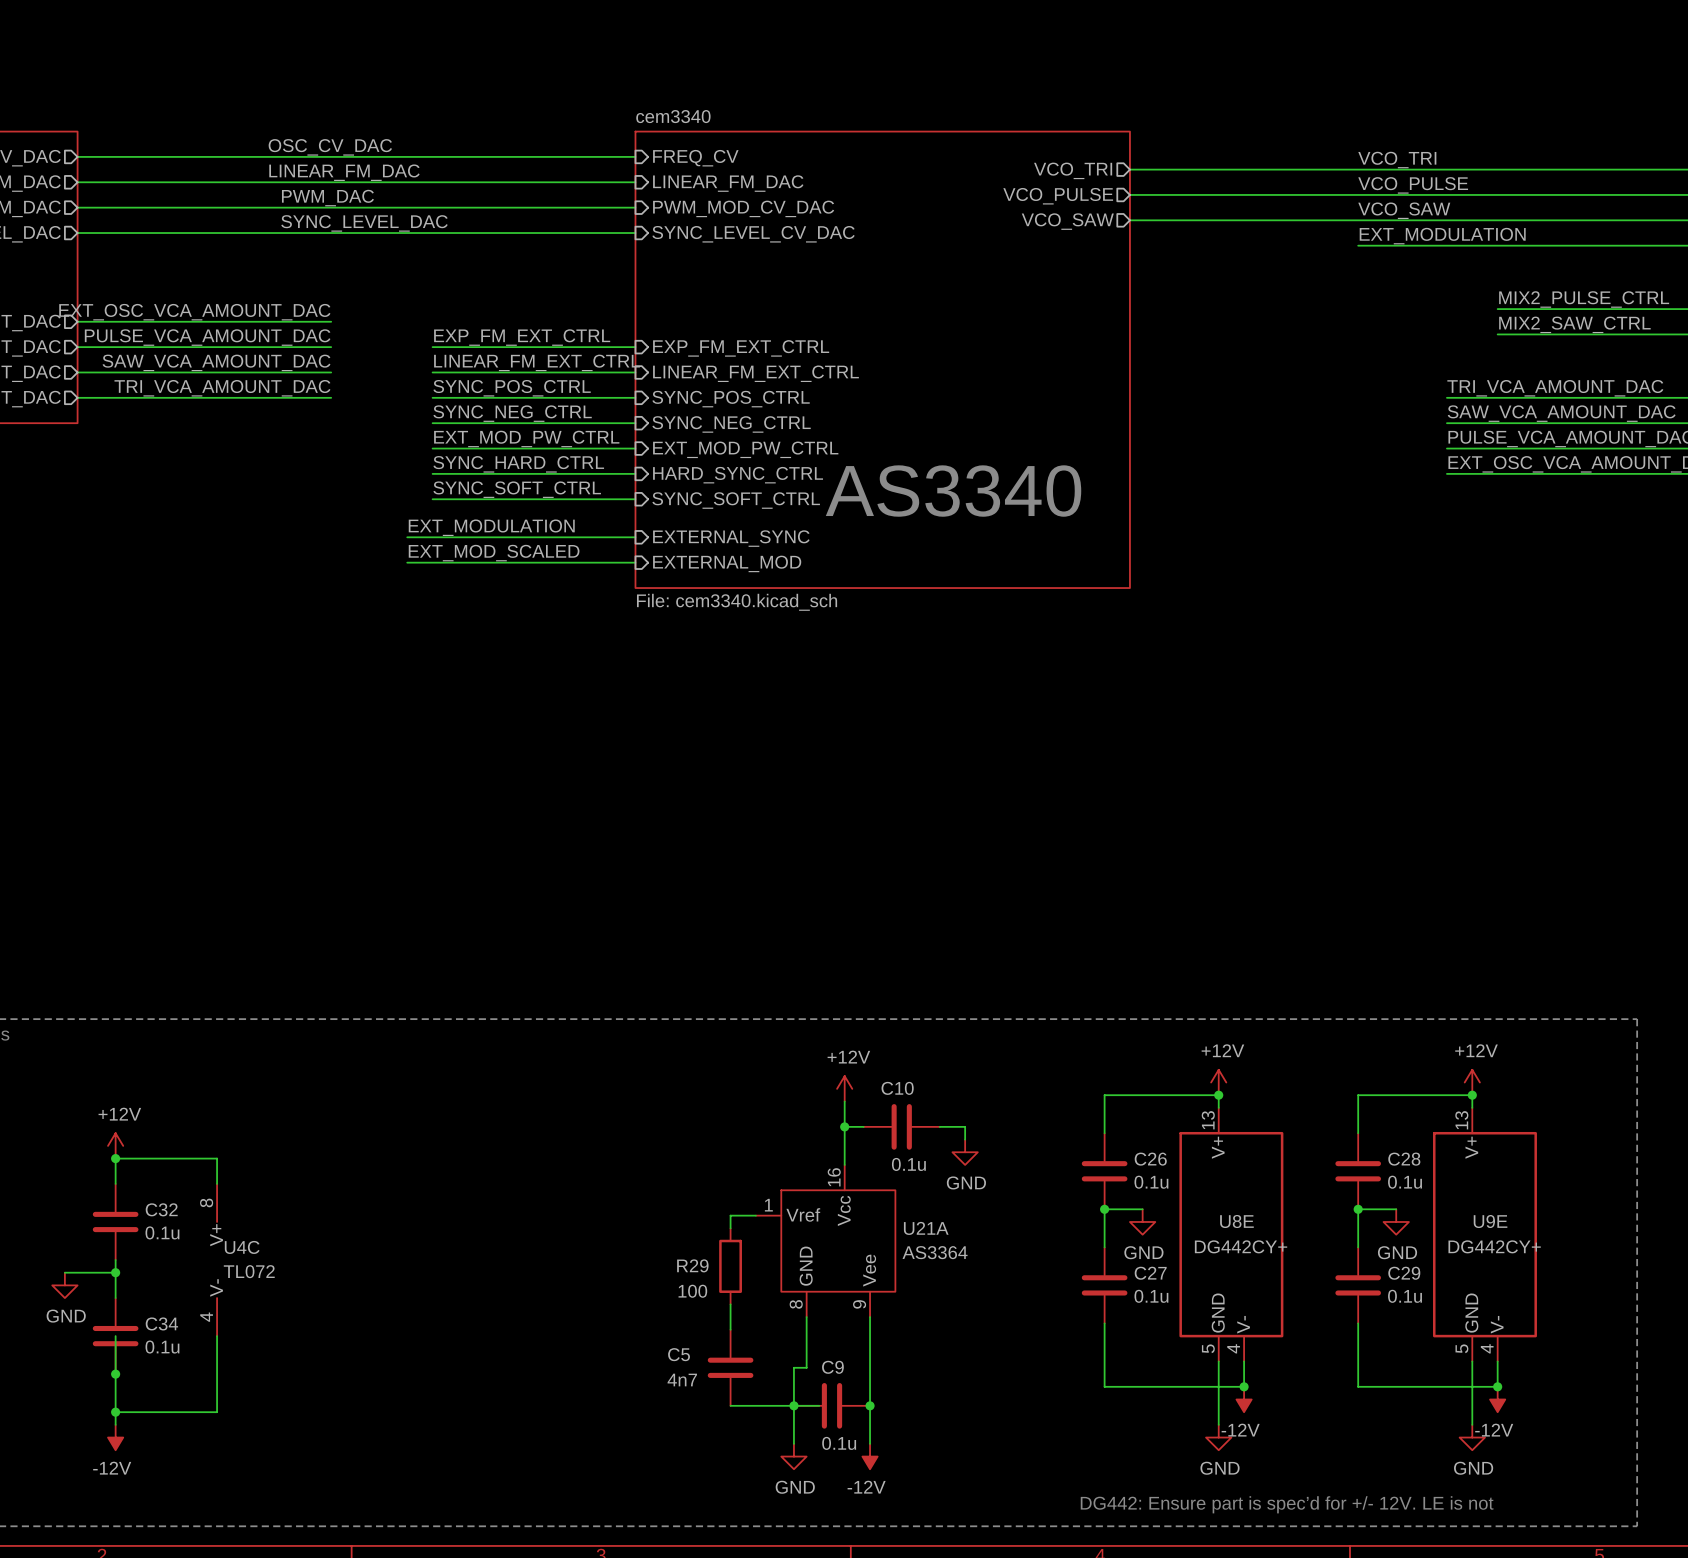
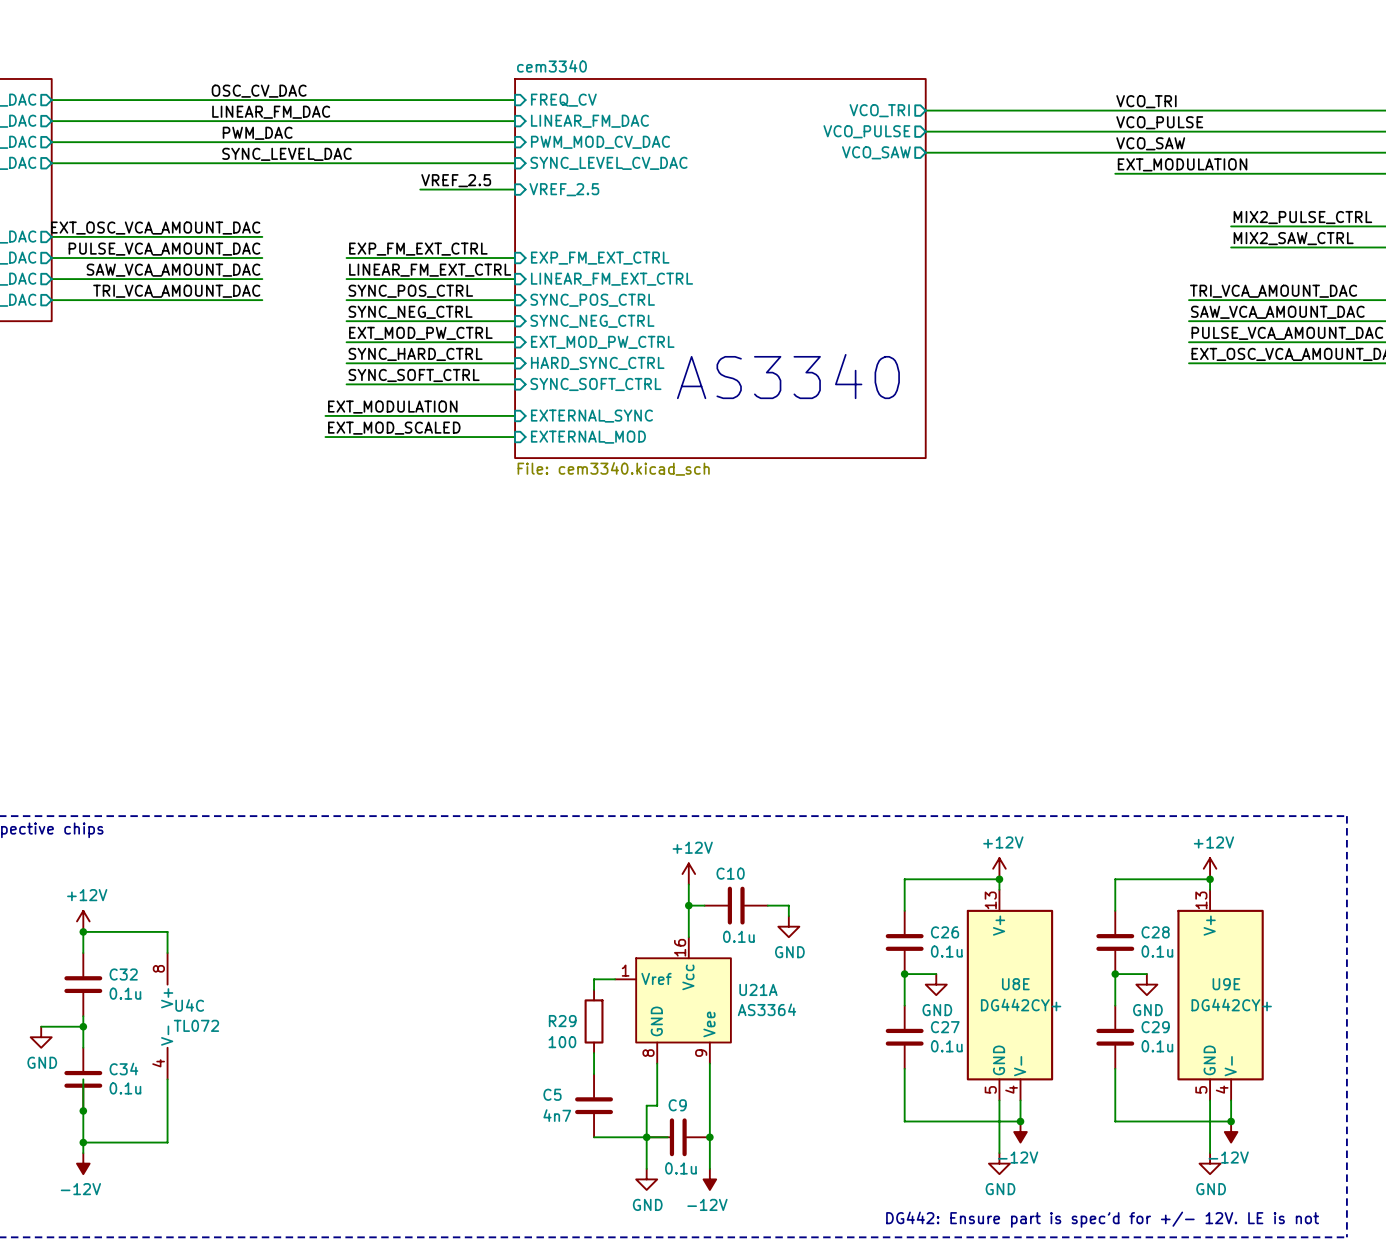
label: none -> VREF_2.5 (456, 180)
wire: none -> (420, 189) (515, 189)
sheet pin: none -> VREF_2.5 (564, 189)

